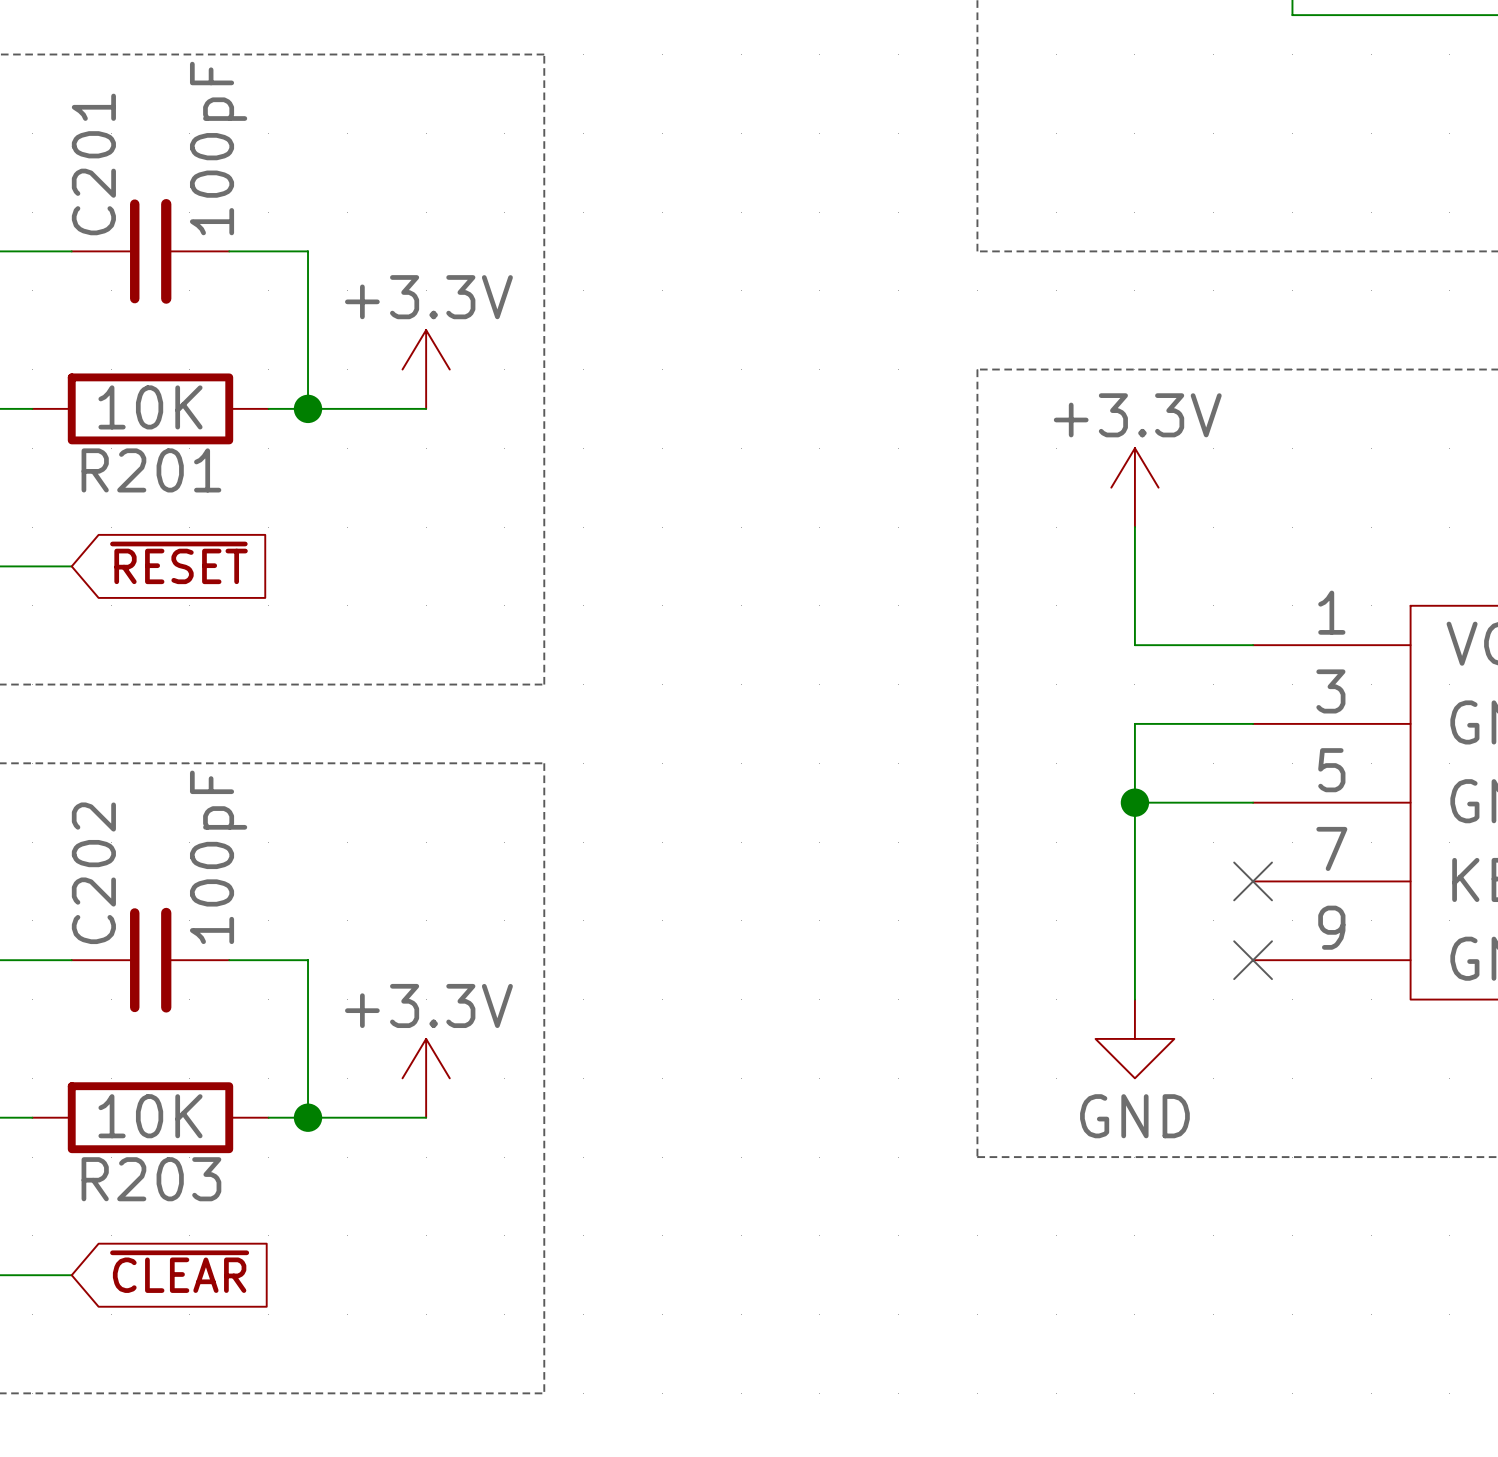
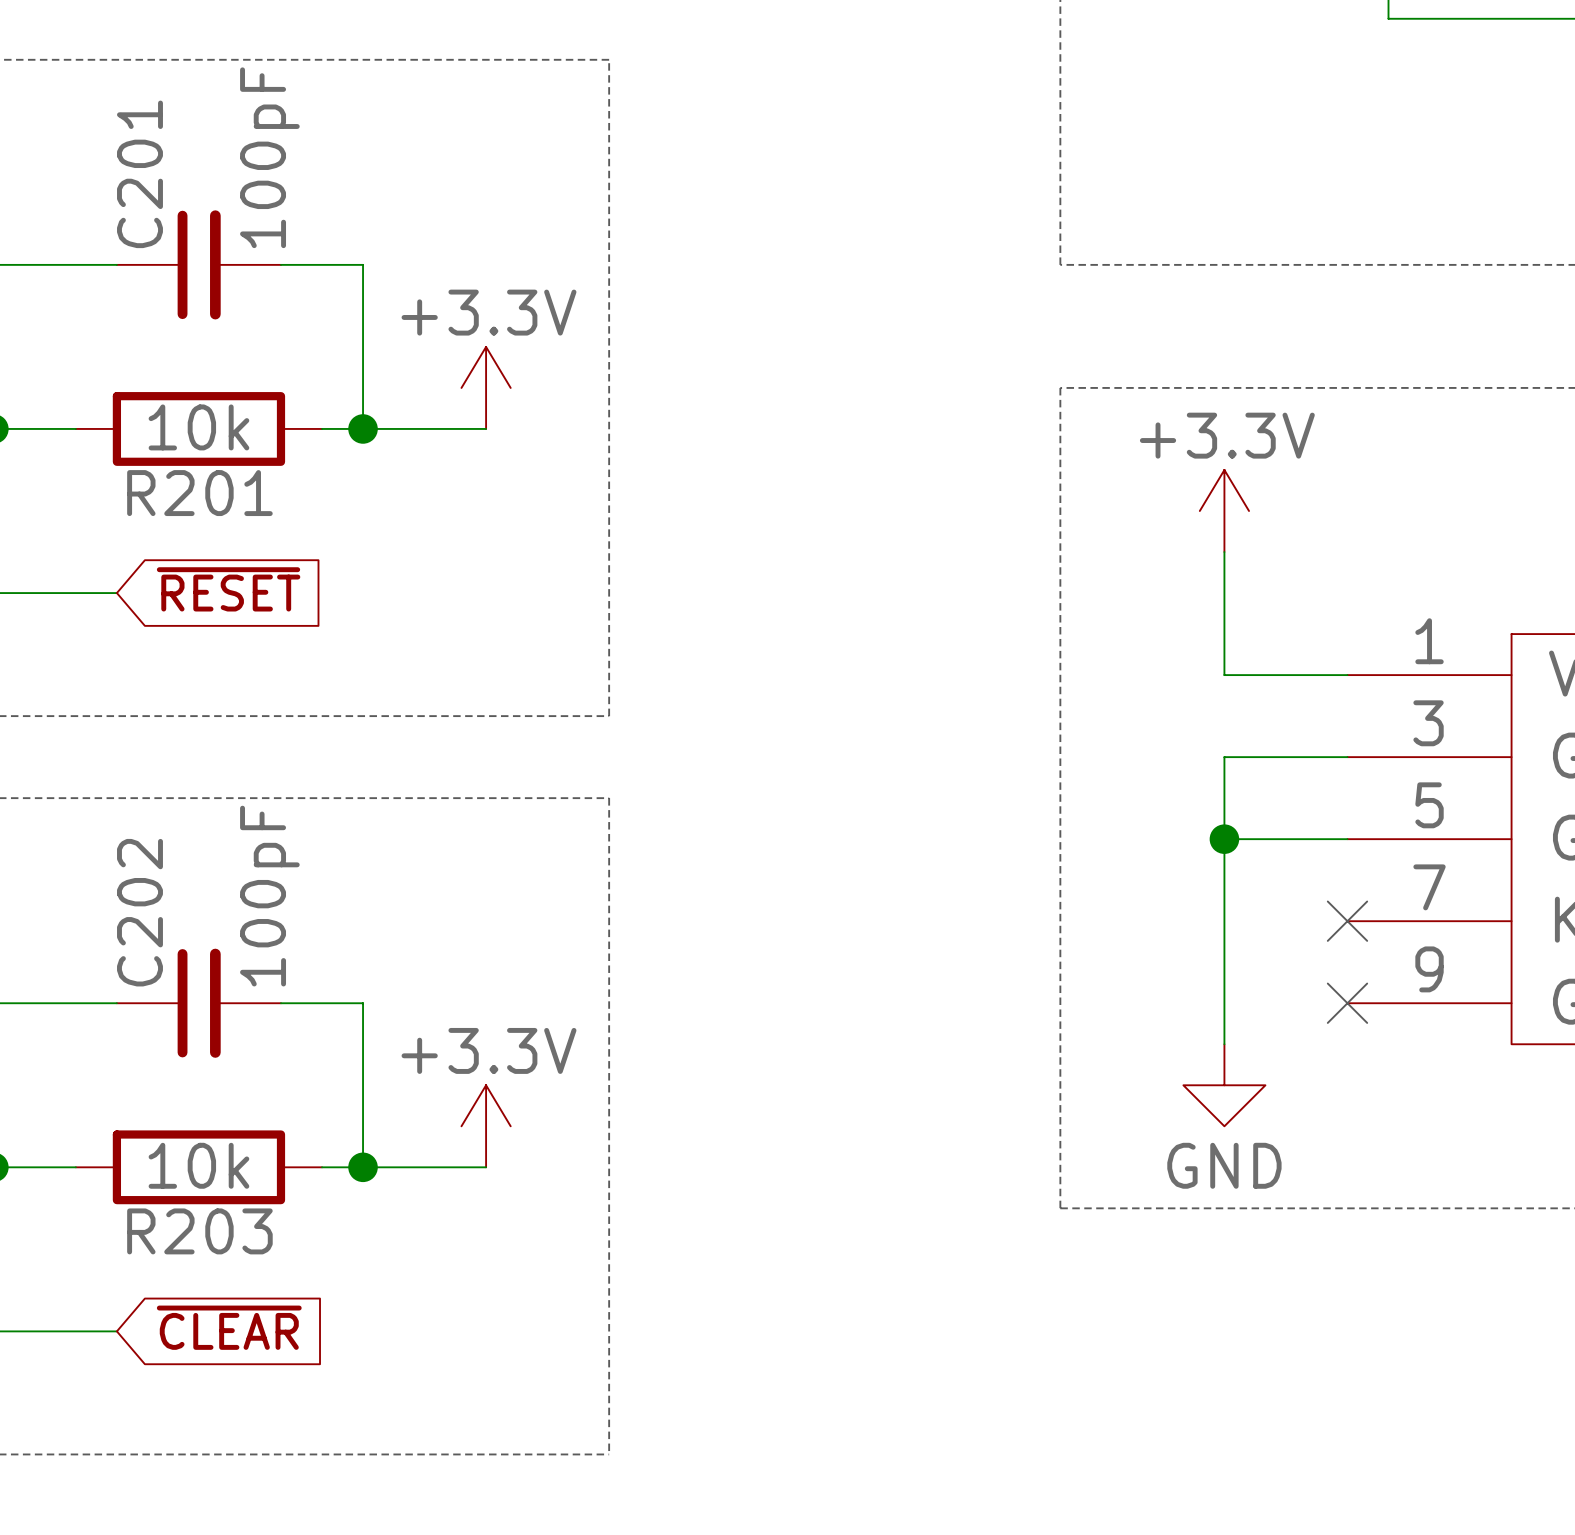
R201 value: 10K (150, 407) -> 10k (198, 427)
R203 value: 10K (150, 1116) -> 10k (198, 1165)

